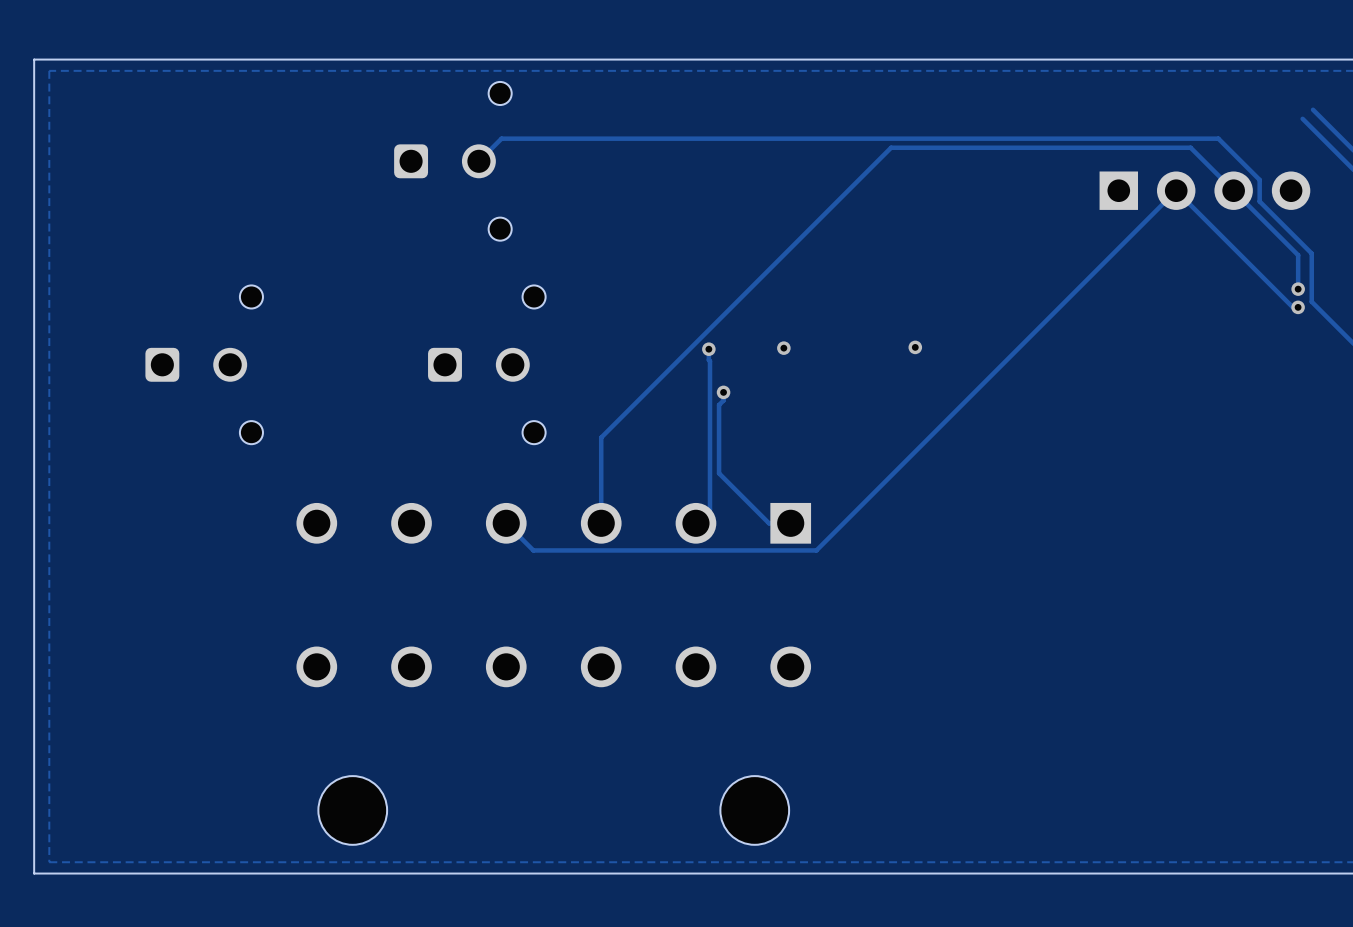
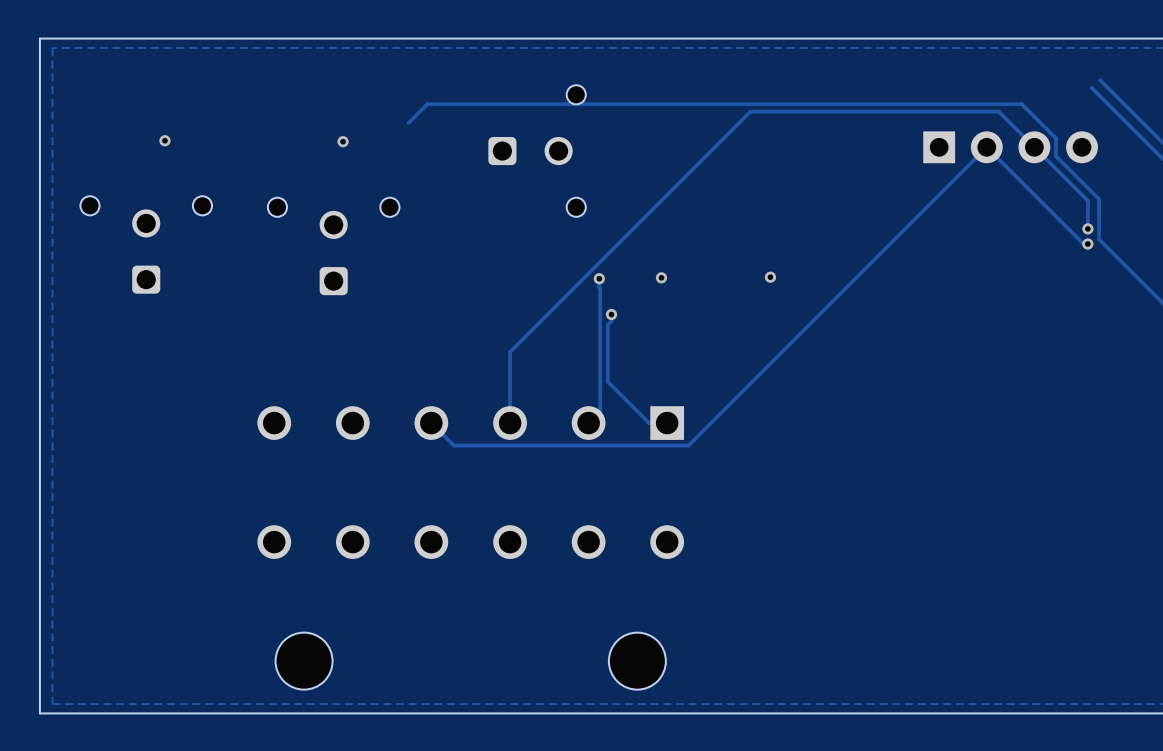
part: (452, 161) -> none
via: none -> (164, 140)
via: none -> (343, 141)
part: none -> (537, 151)
part: none -> (333, 246)
part rotation: 0° (204, 364) -> 90° counterclockwise (146, 244)
part: (486, 364) -> none

